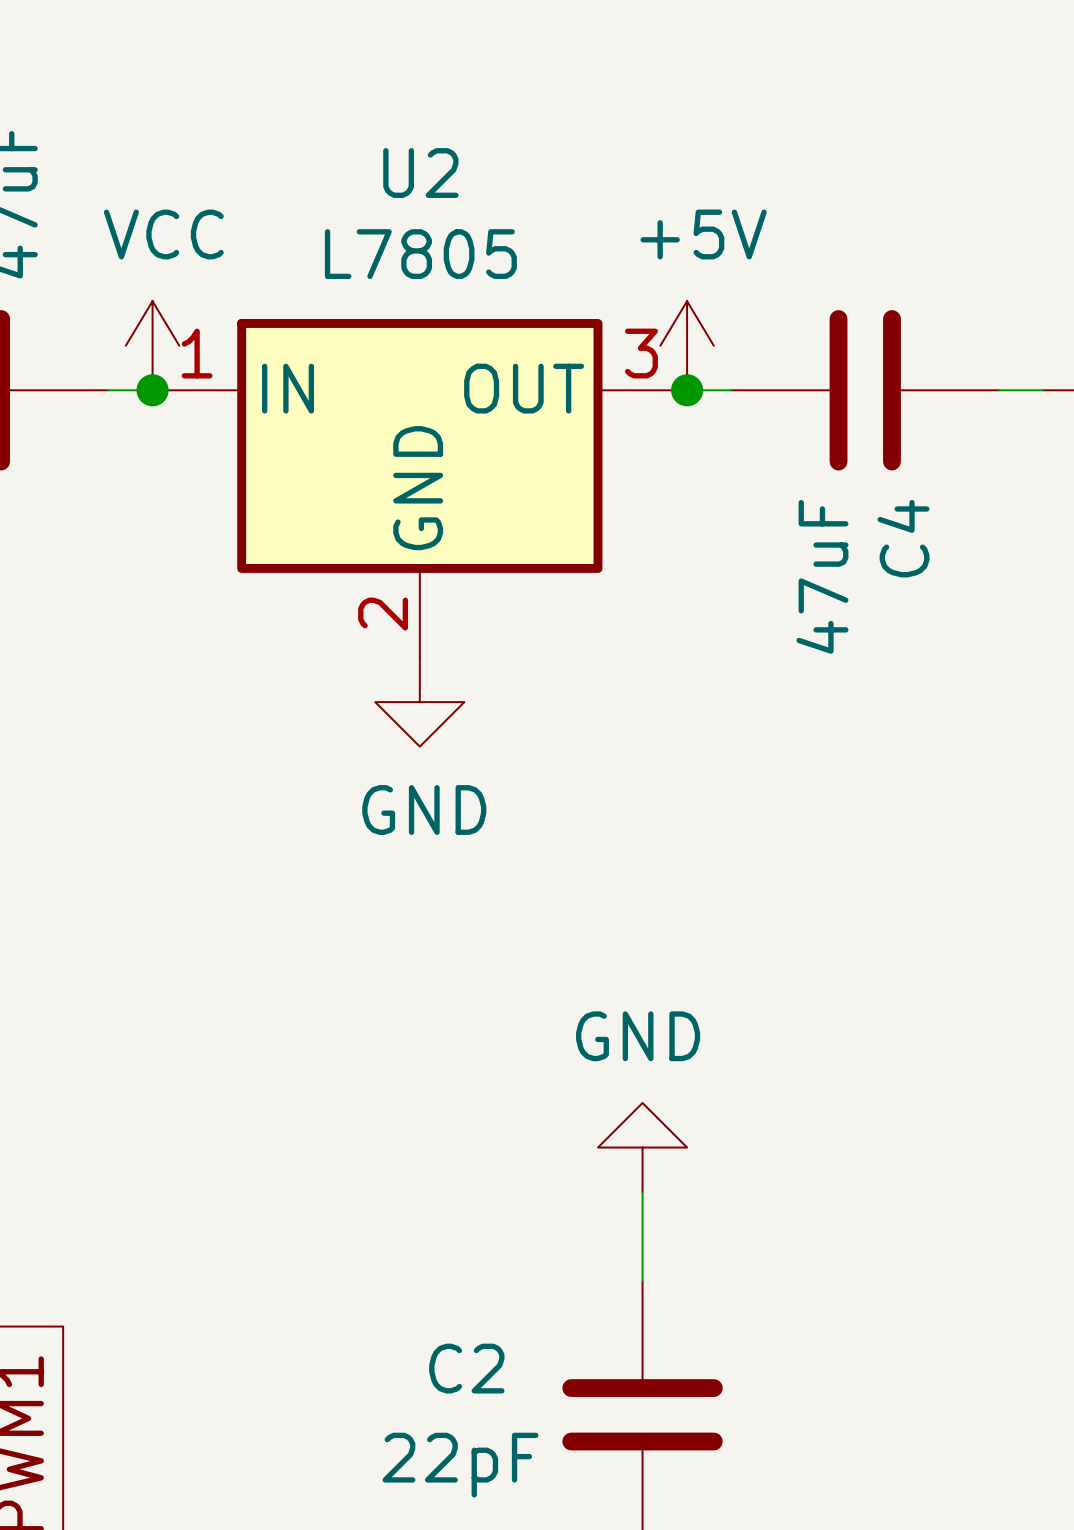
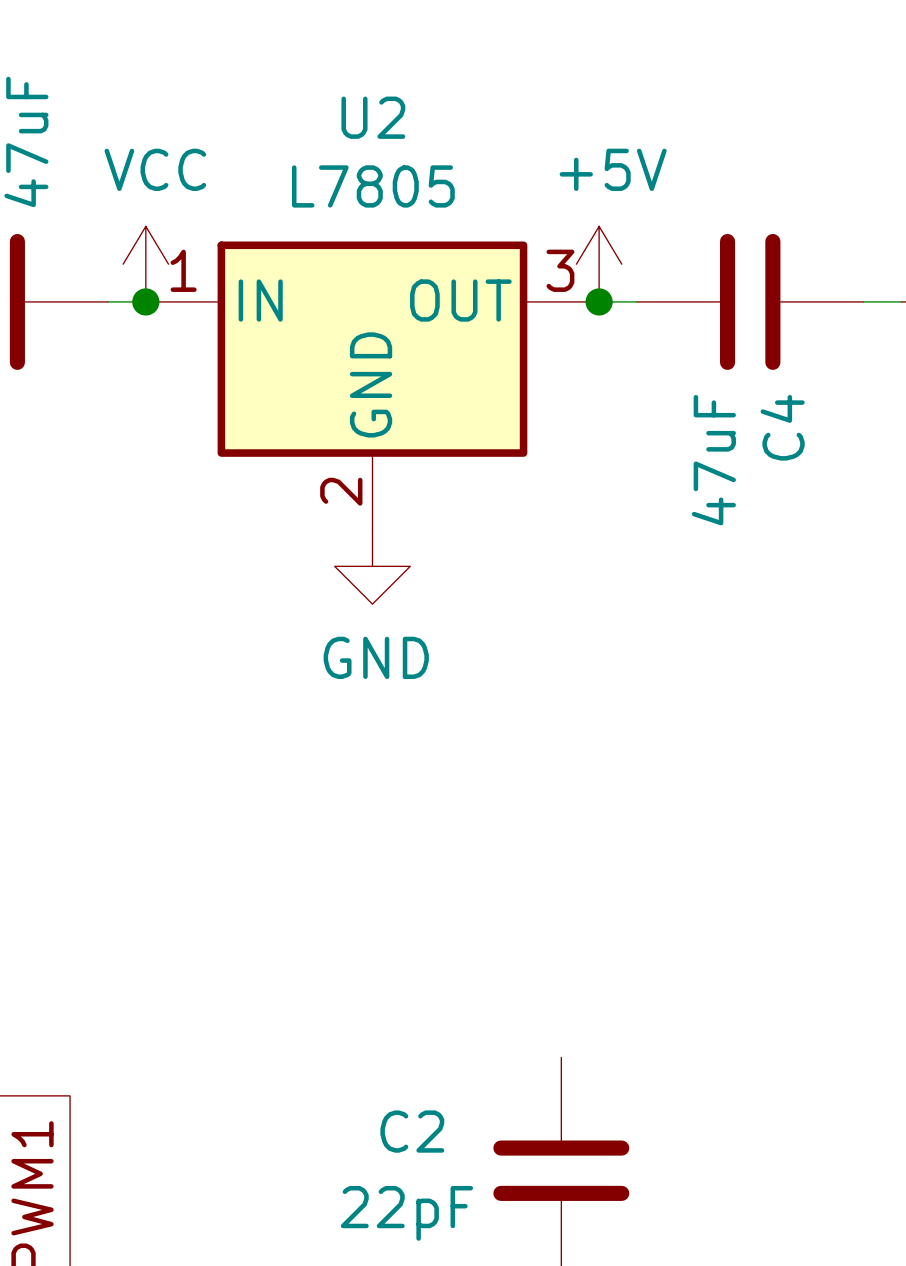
power symbol: GND (642, 1147) -> none
wire: (642, 1192) (642, 1281) -> none

